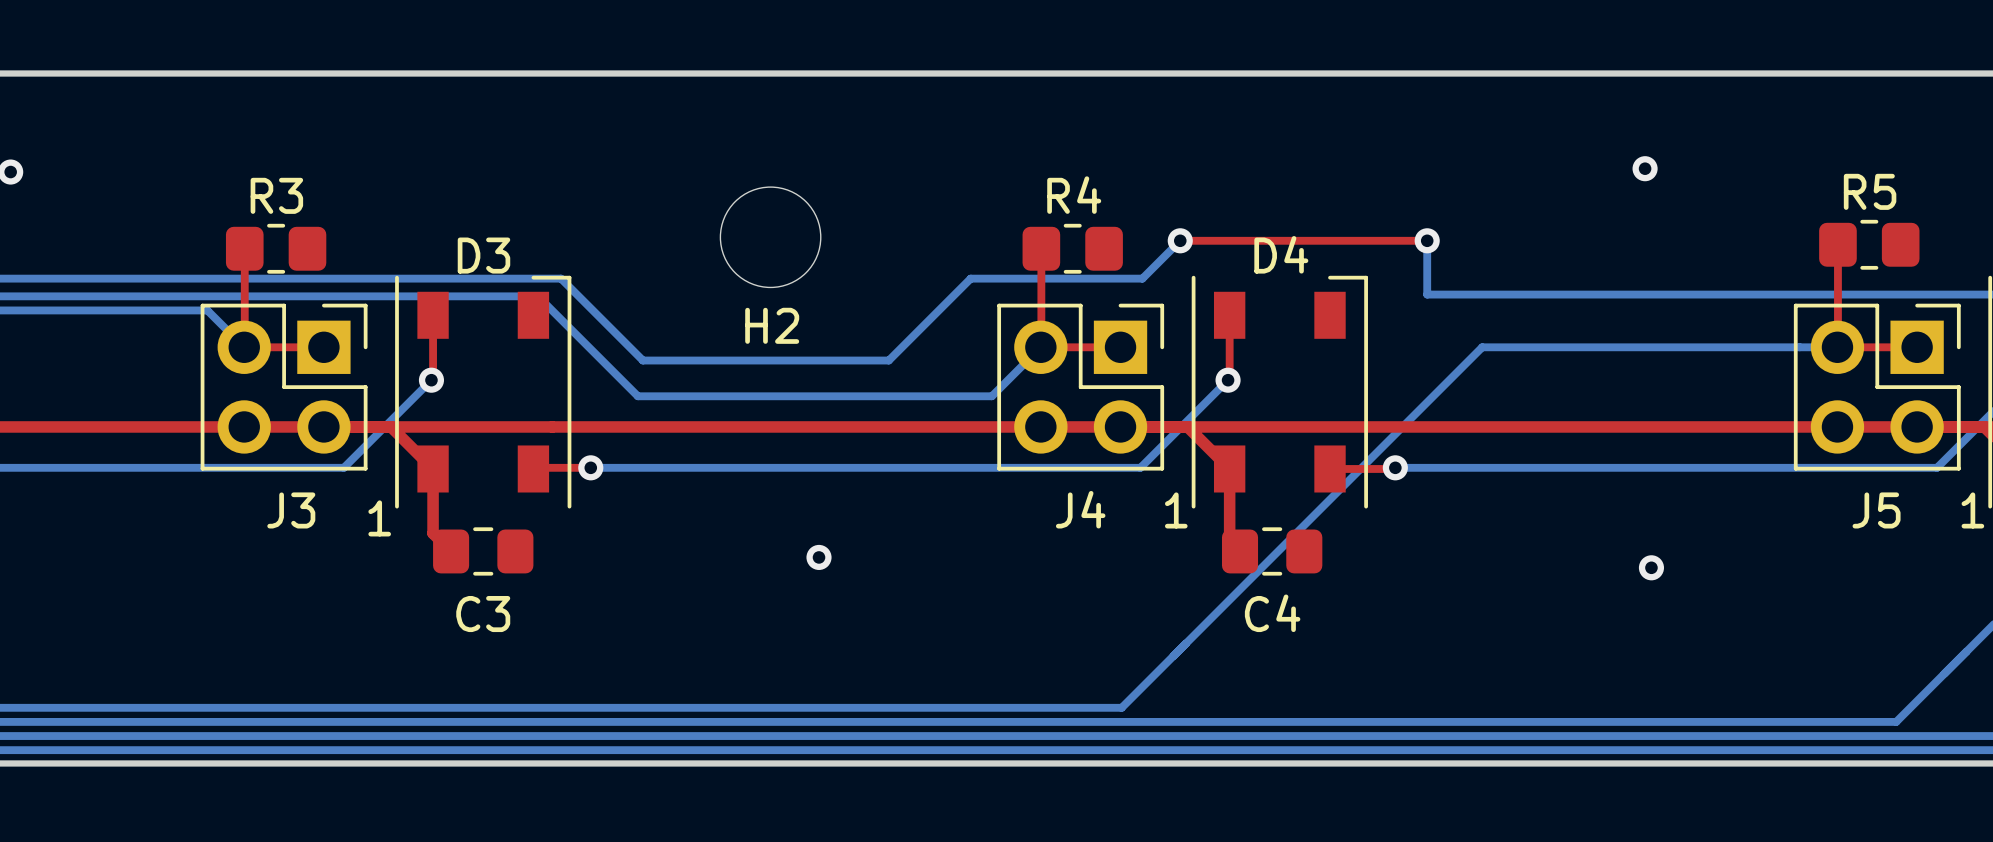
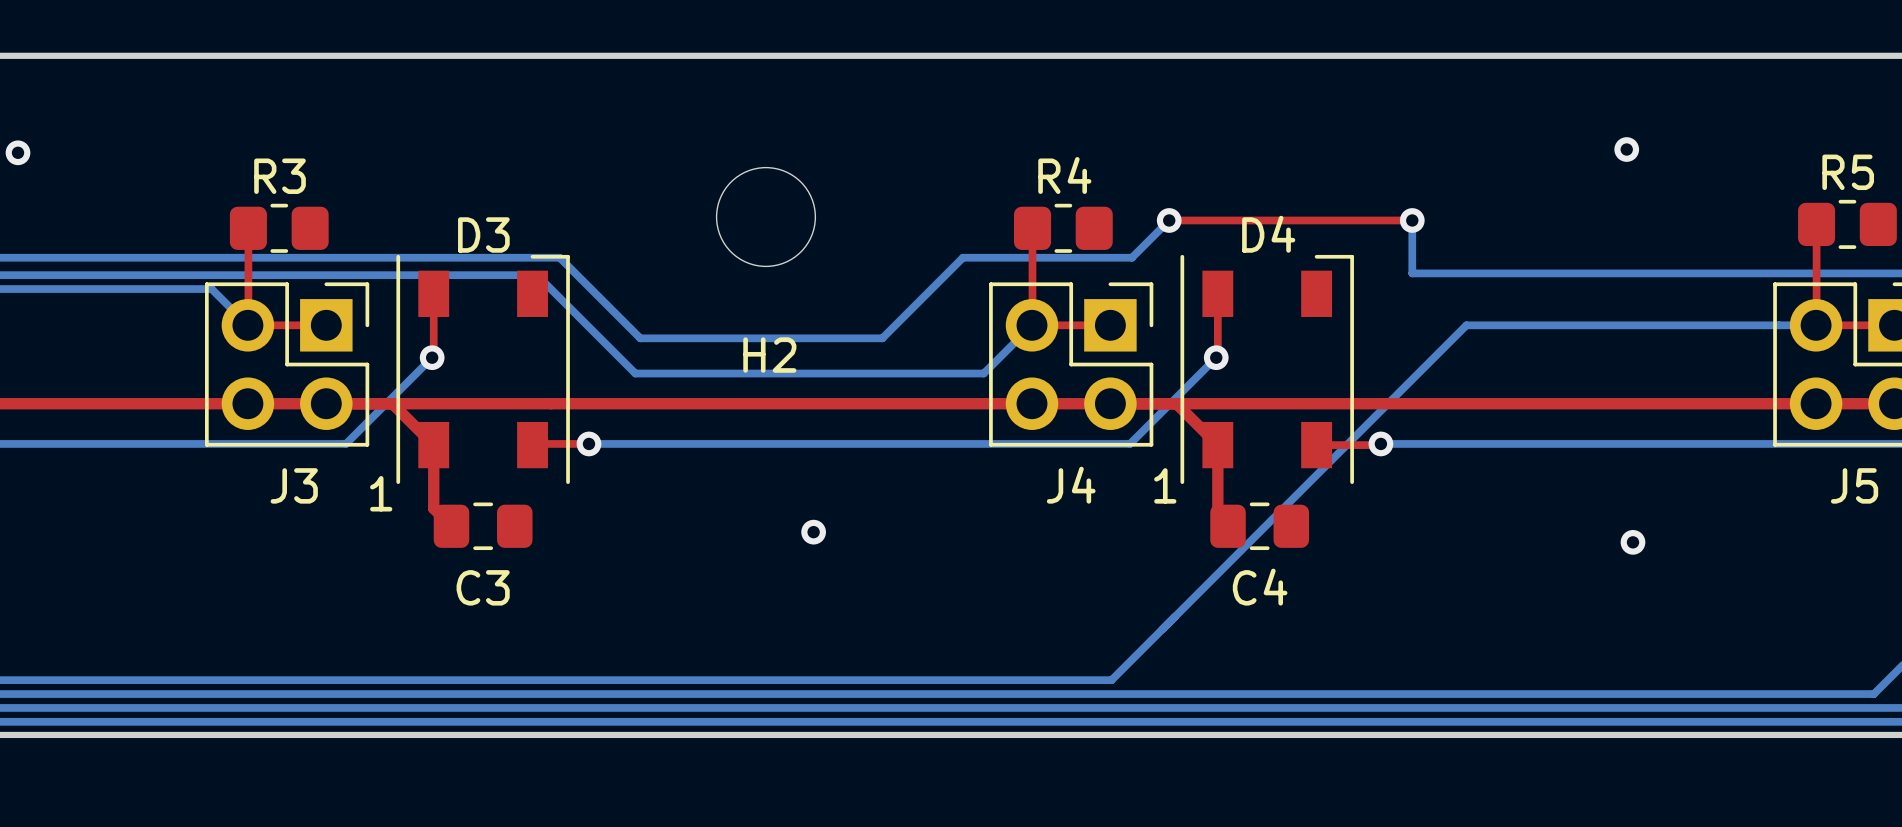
H2 name position: H2 (772, 325) -> H2 (769, 355)

